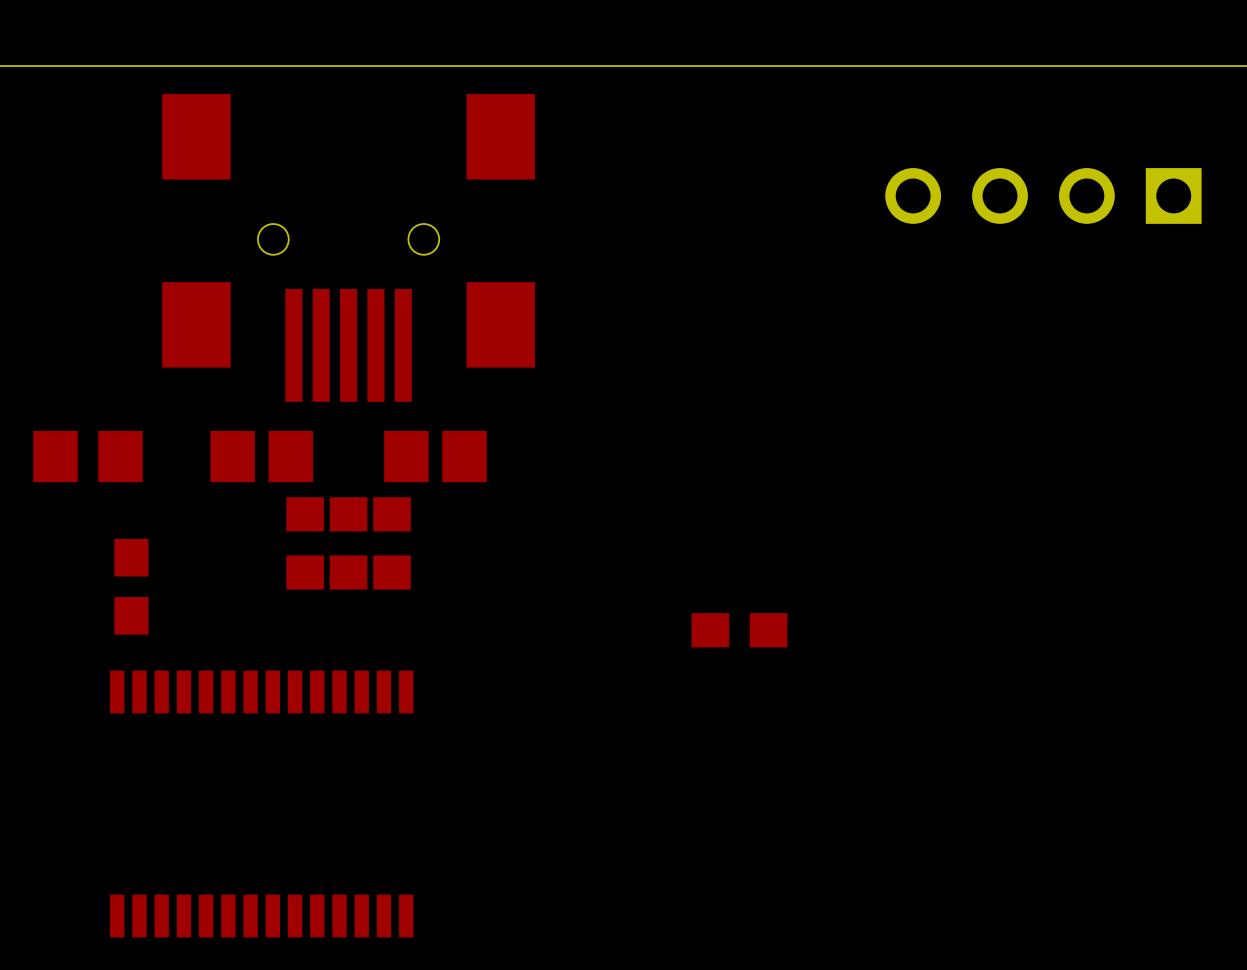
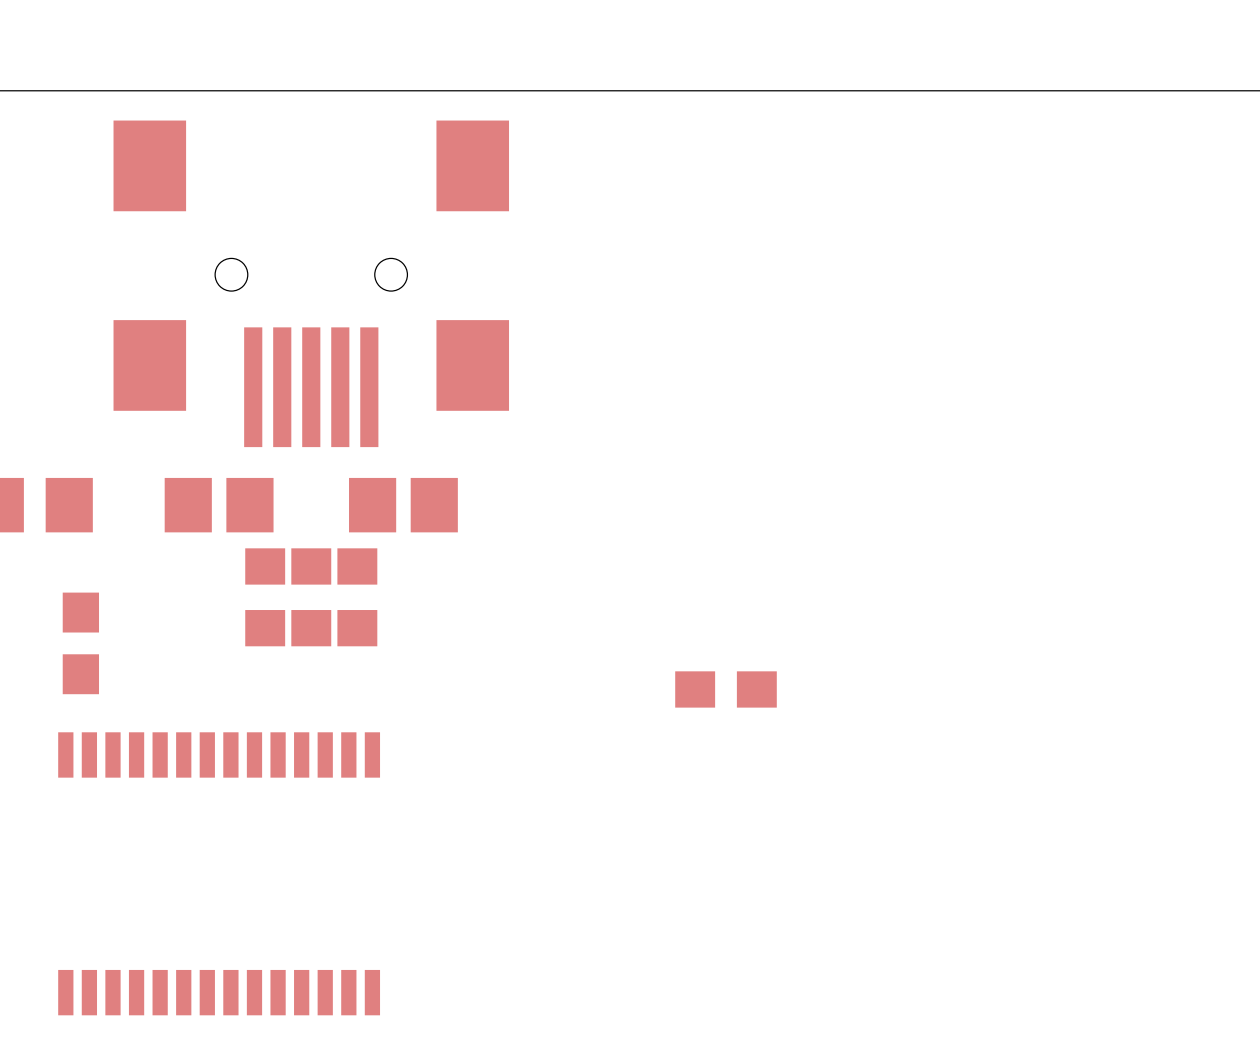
part: (1043, 195) -> none

